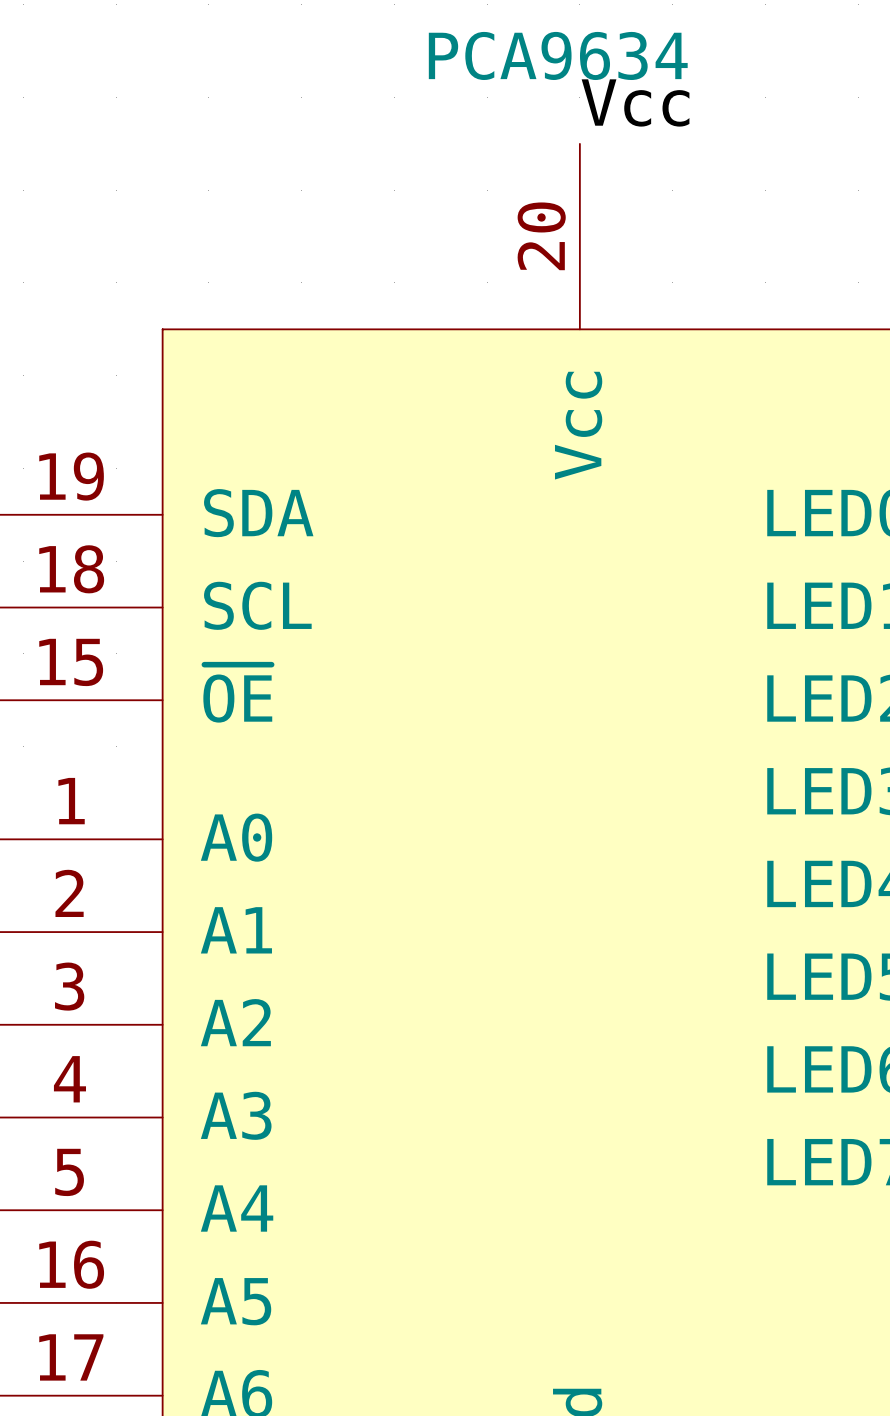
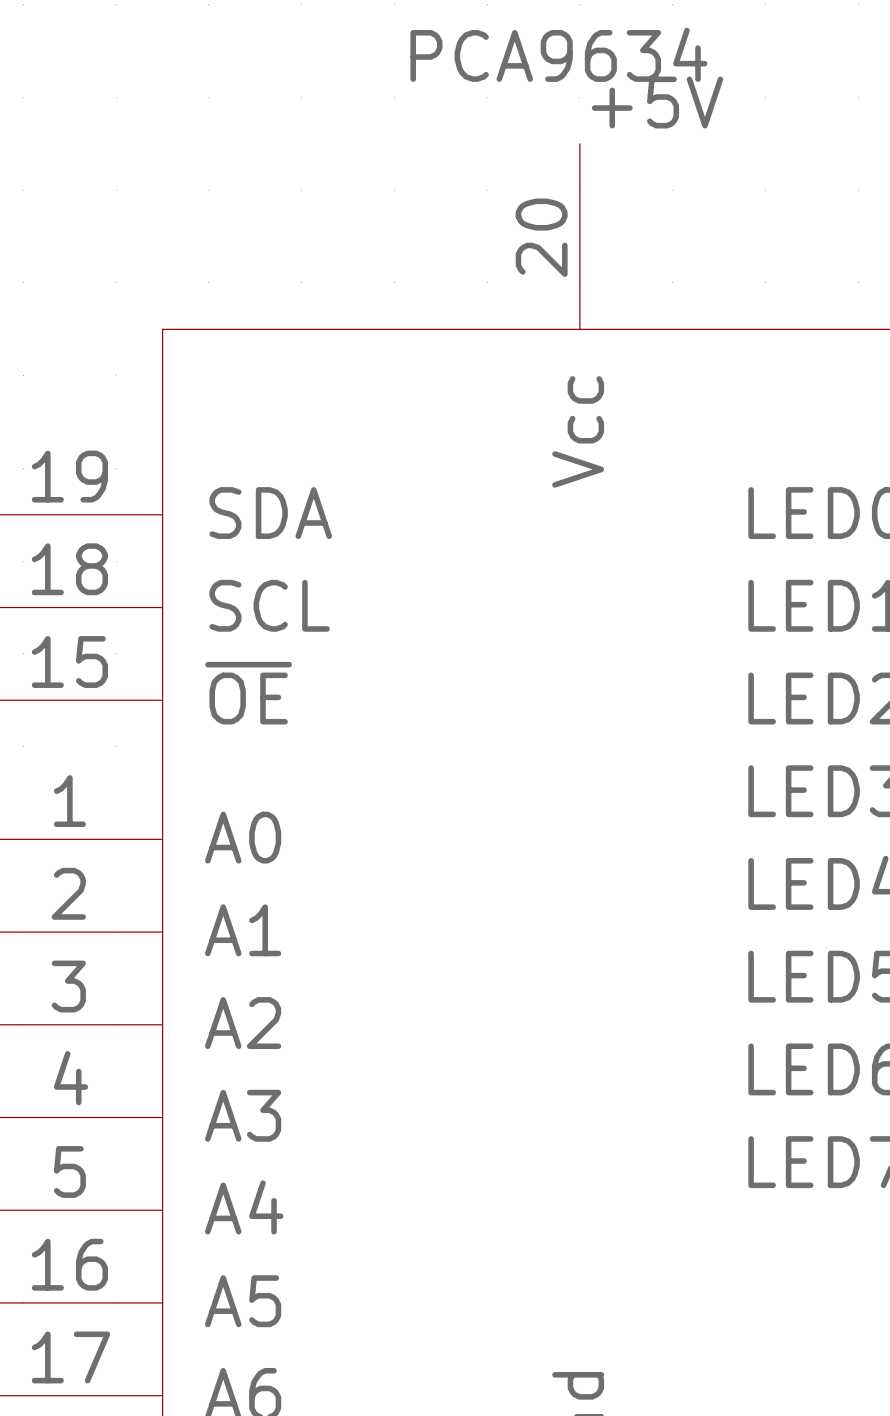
label: Vcc (635, 102) -> +5V (657, 102)

